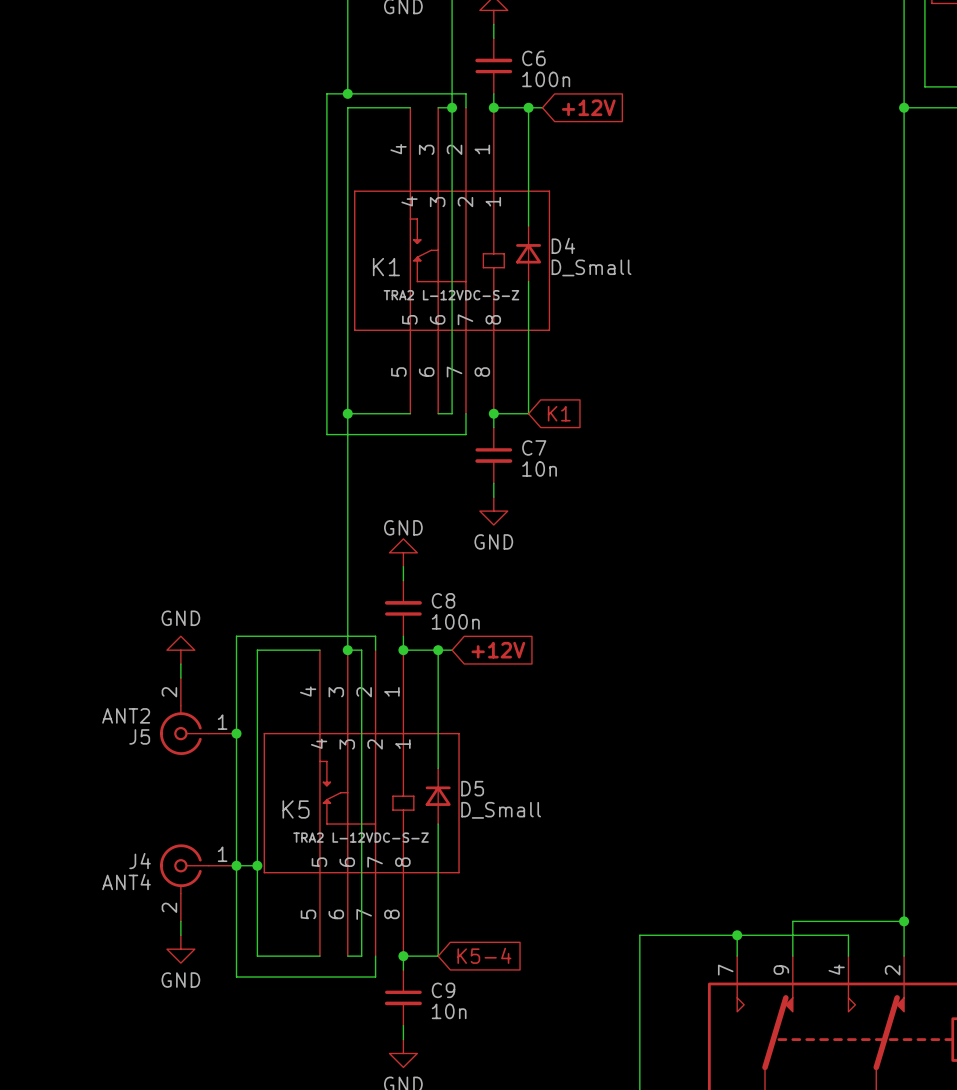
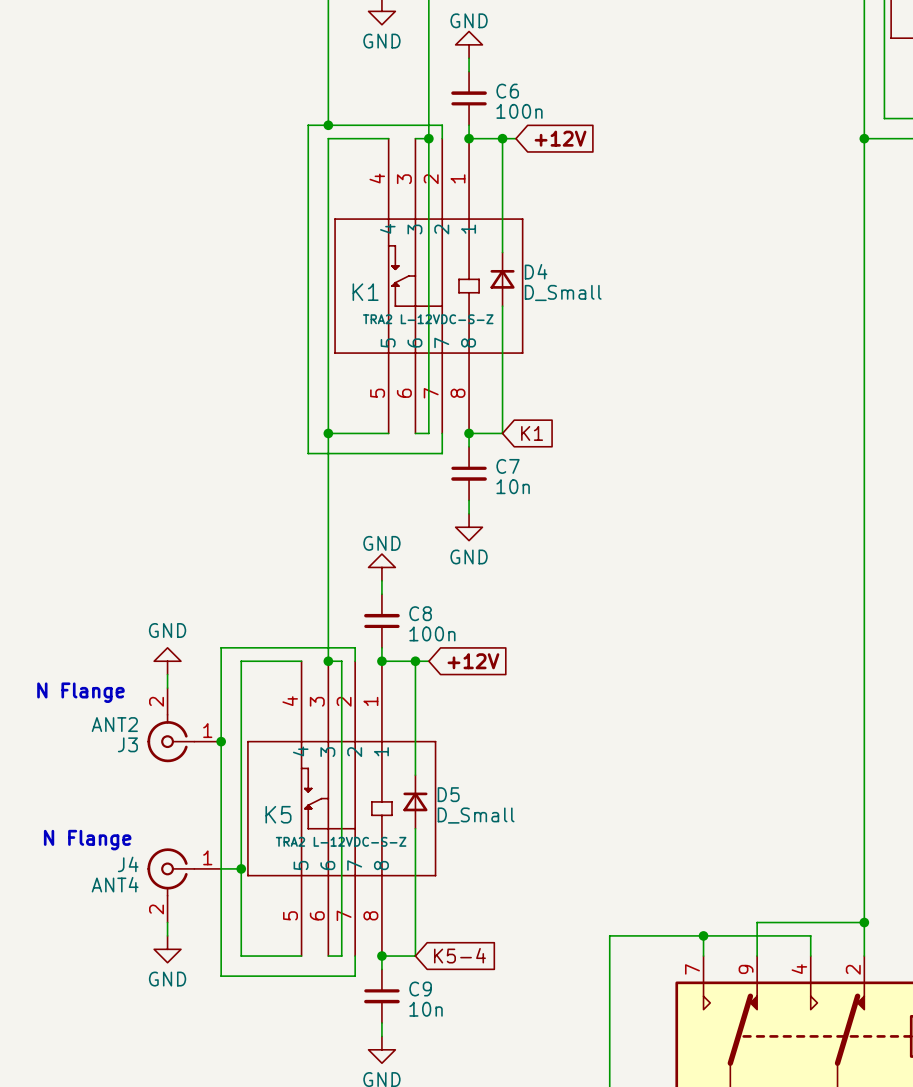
text: none -> N Flange (80, 692)
J5 name: J5 (139, 736) -> J3 (127, 744)
text: none -> N Flange (87, 840)
junction: (236, 865) -> none

